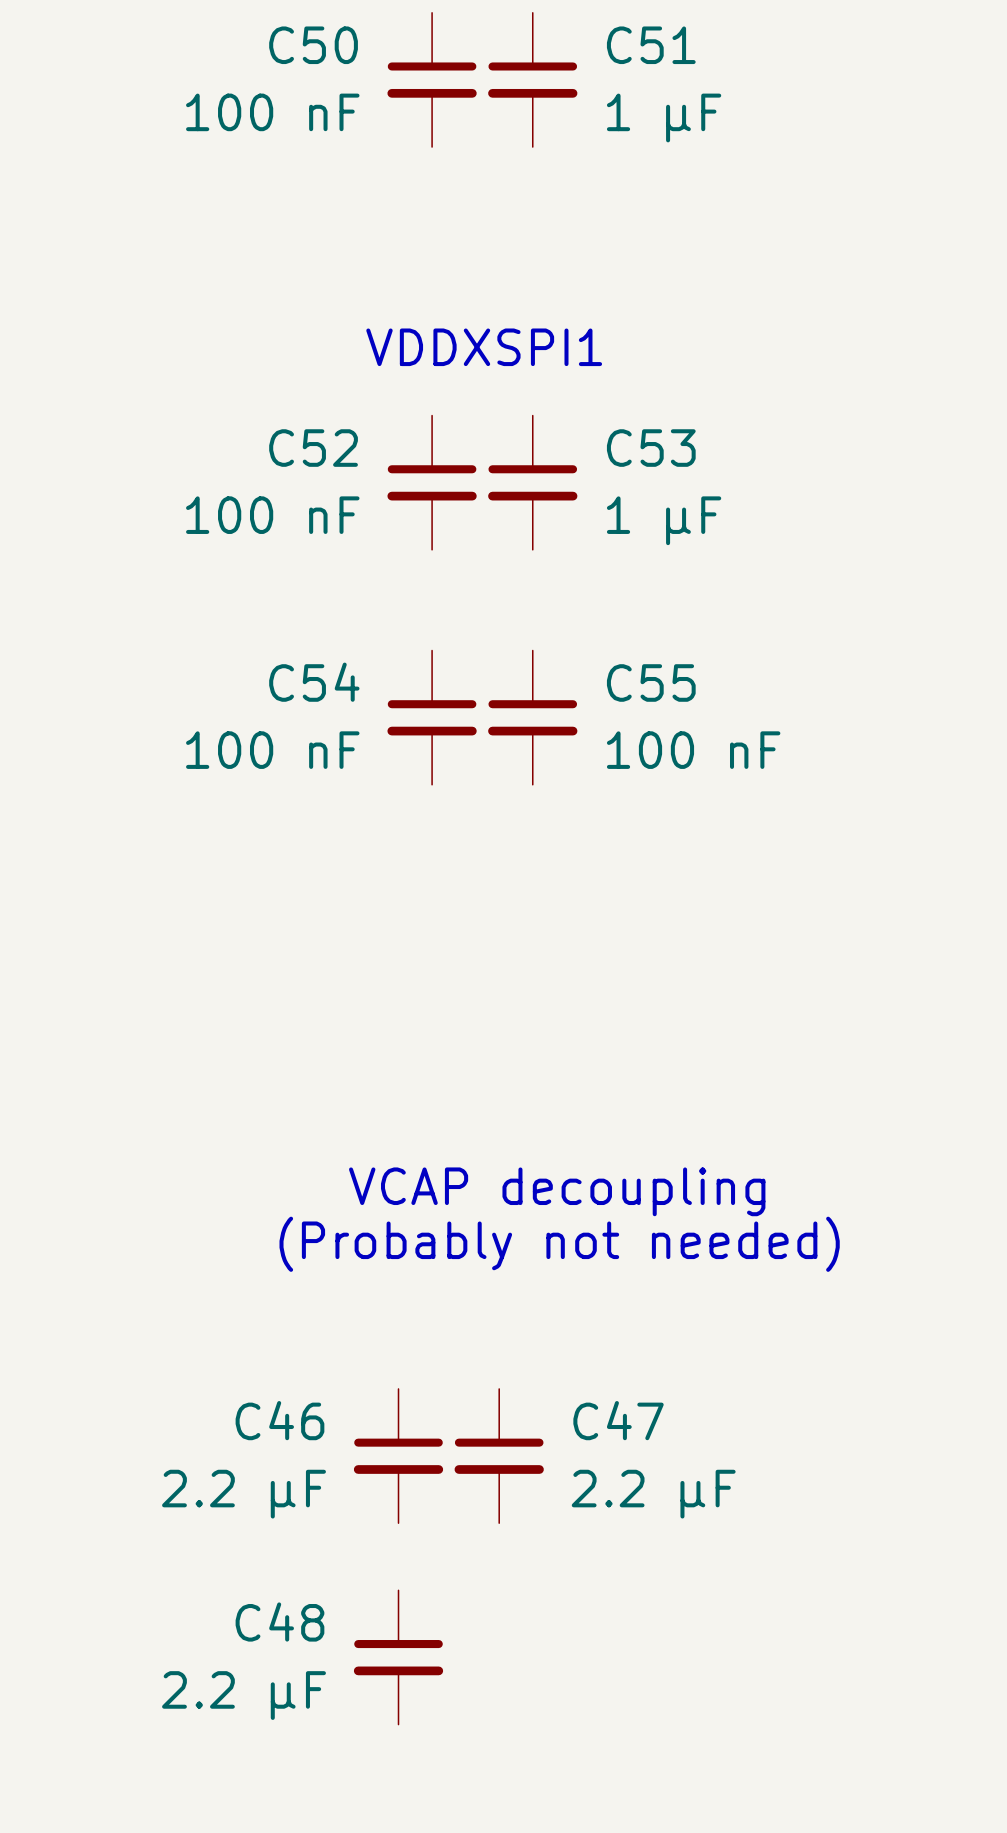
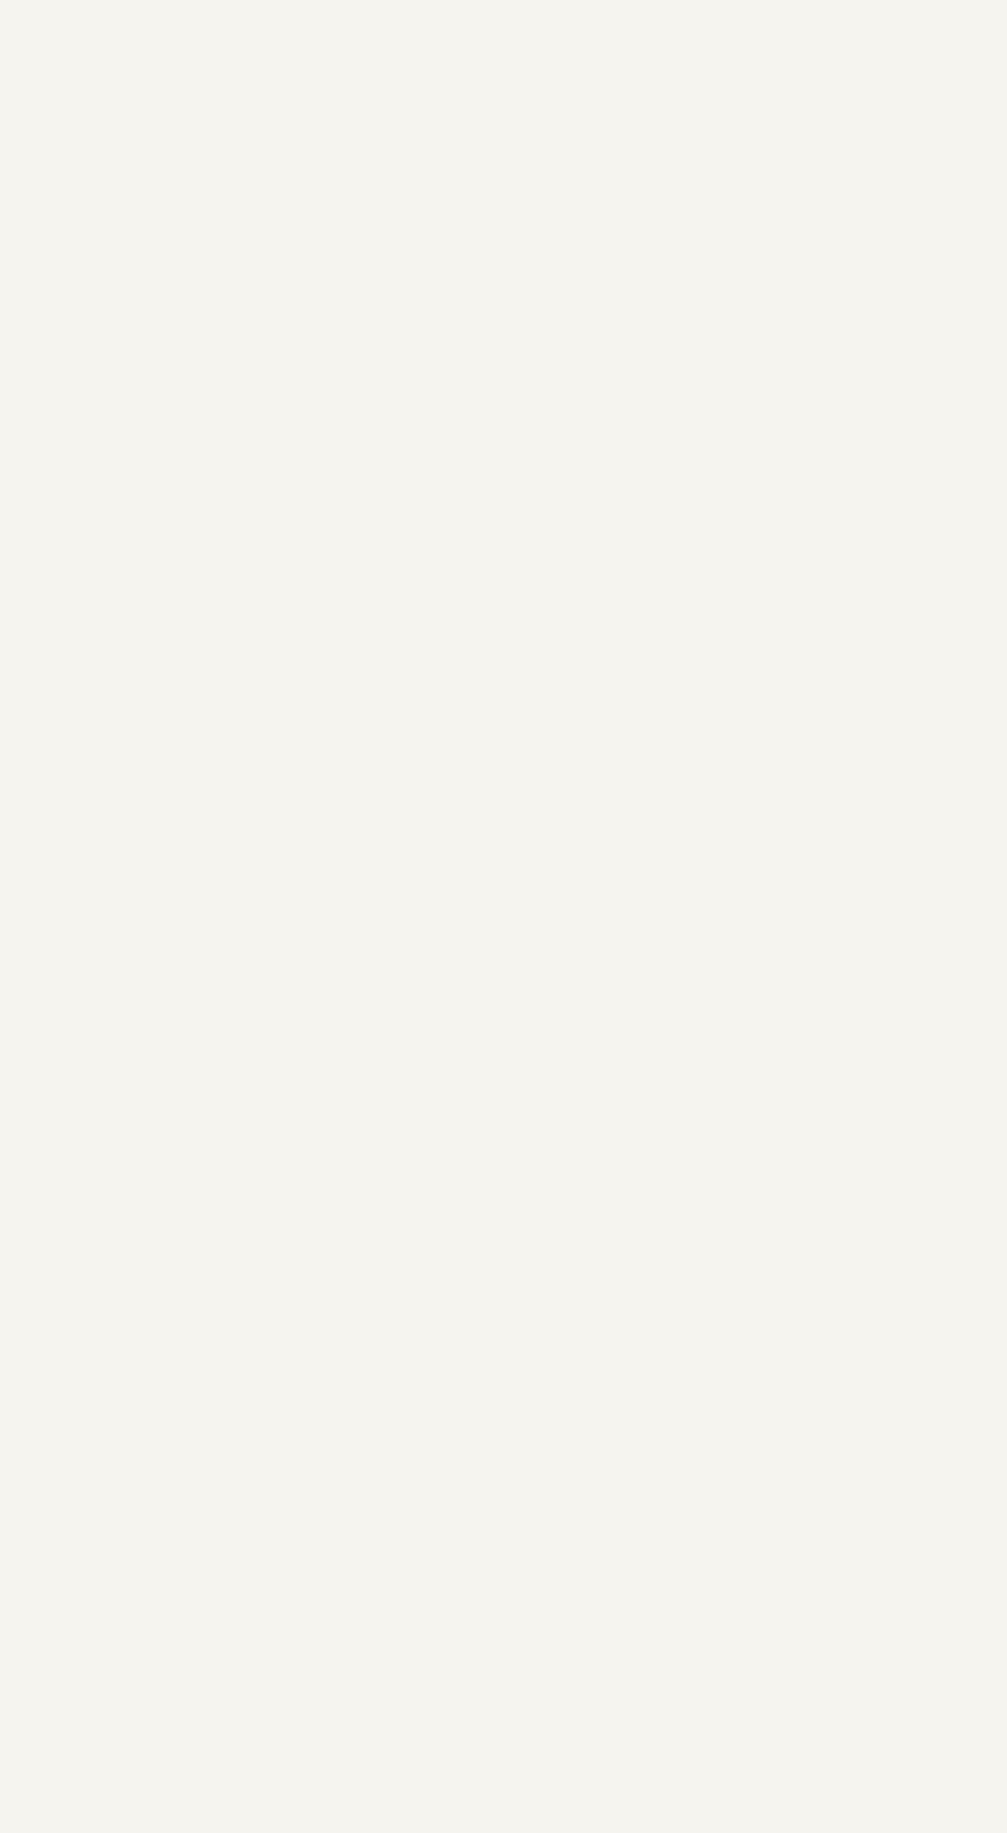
C50: 100 nF (432, 79) -> none
C51: 1 µF (532, 79) -> none
text: VDDXSPI1 (484, 347) -> none
C52: 100 nF (432, 482) -> none
C53: 1 µF (532, 482) -> none
C54: 100 nF (432, 717) -> none
C55: 100 nF (532, 717) -> none
text: VCAP decoupling (557, 1191) -> none
text: (Probably not needed) (559, 1244) -> none
C46: 2.2 µF (398, 1456) -> none
C47: 2.2 µF (499, 1456) -> none
C48: 2.2 µF (398, 1657) -> none

